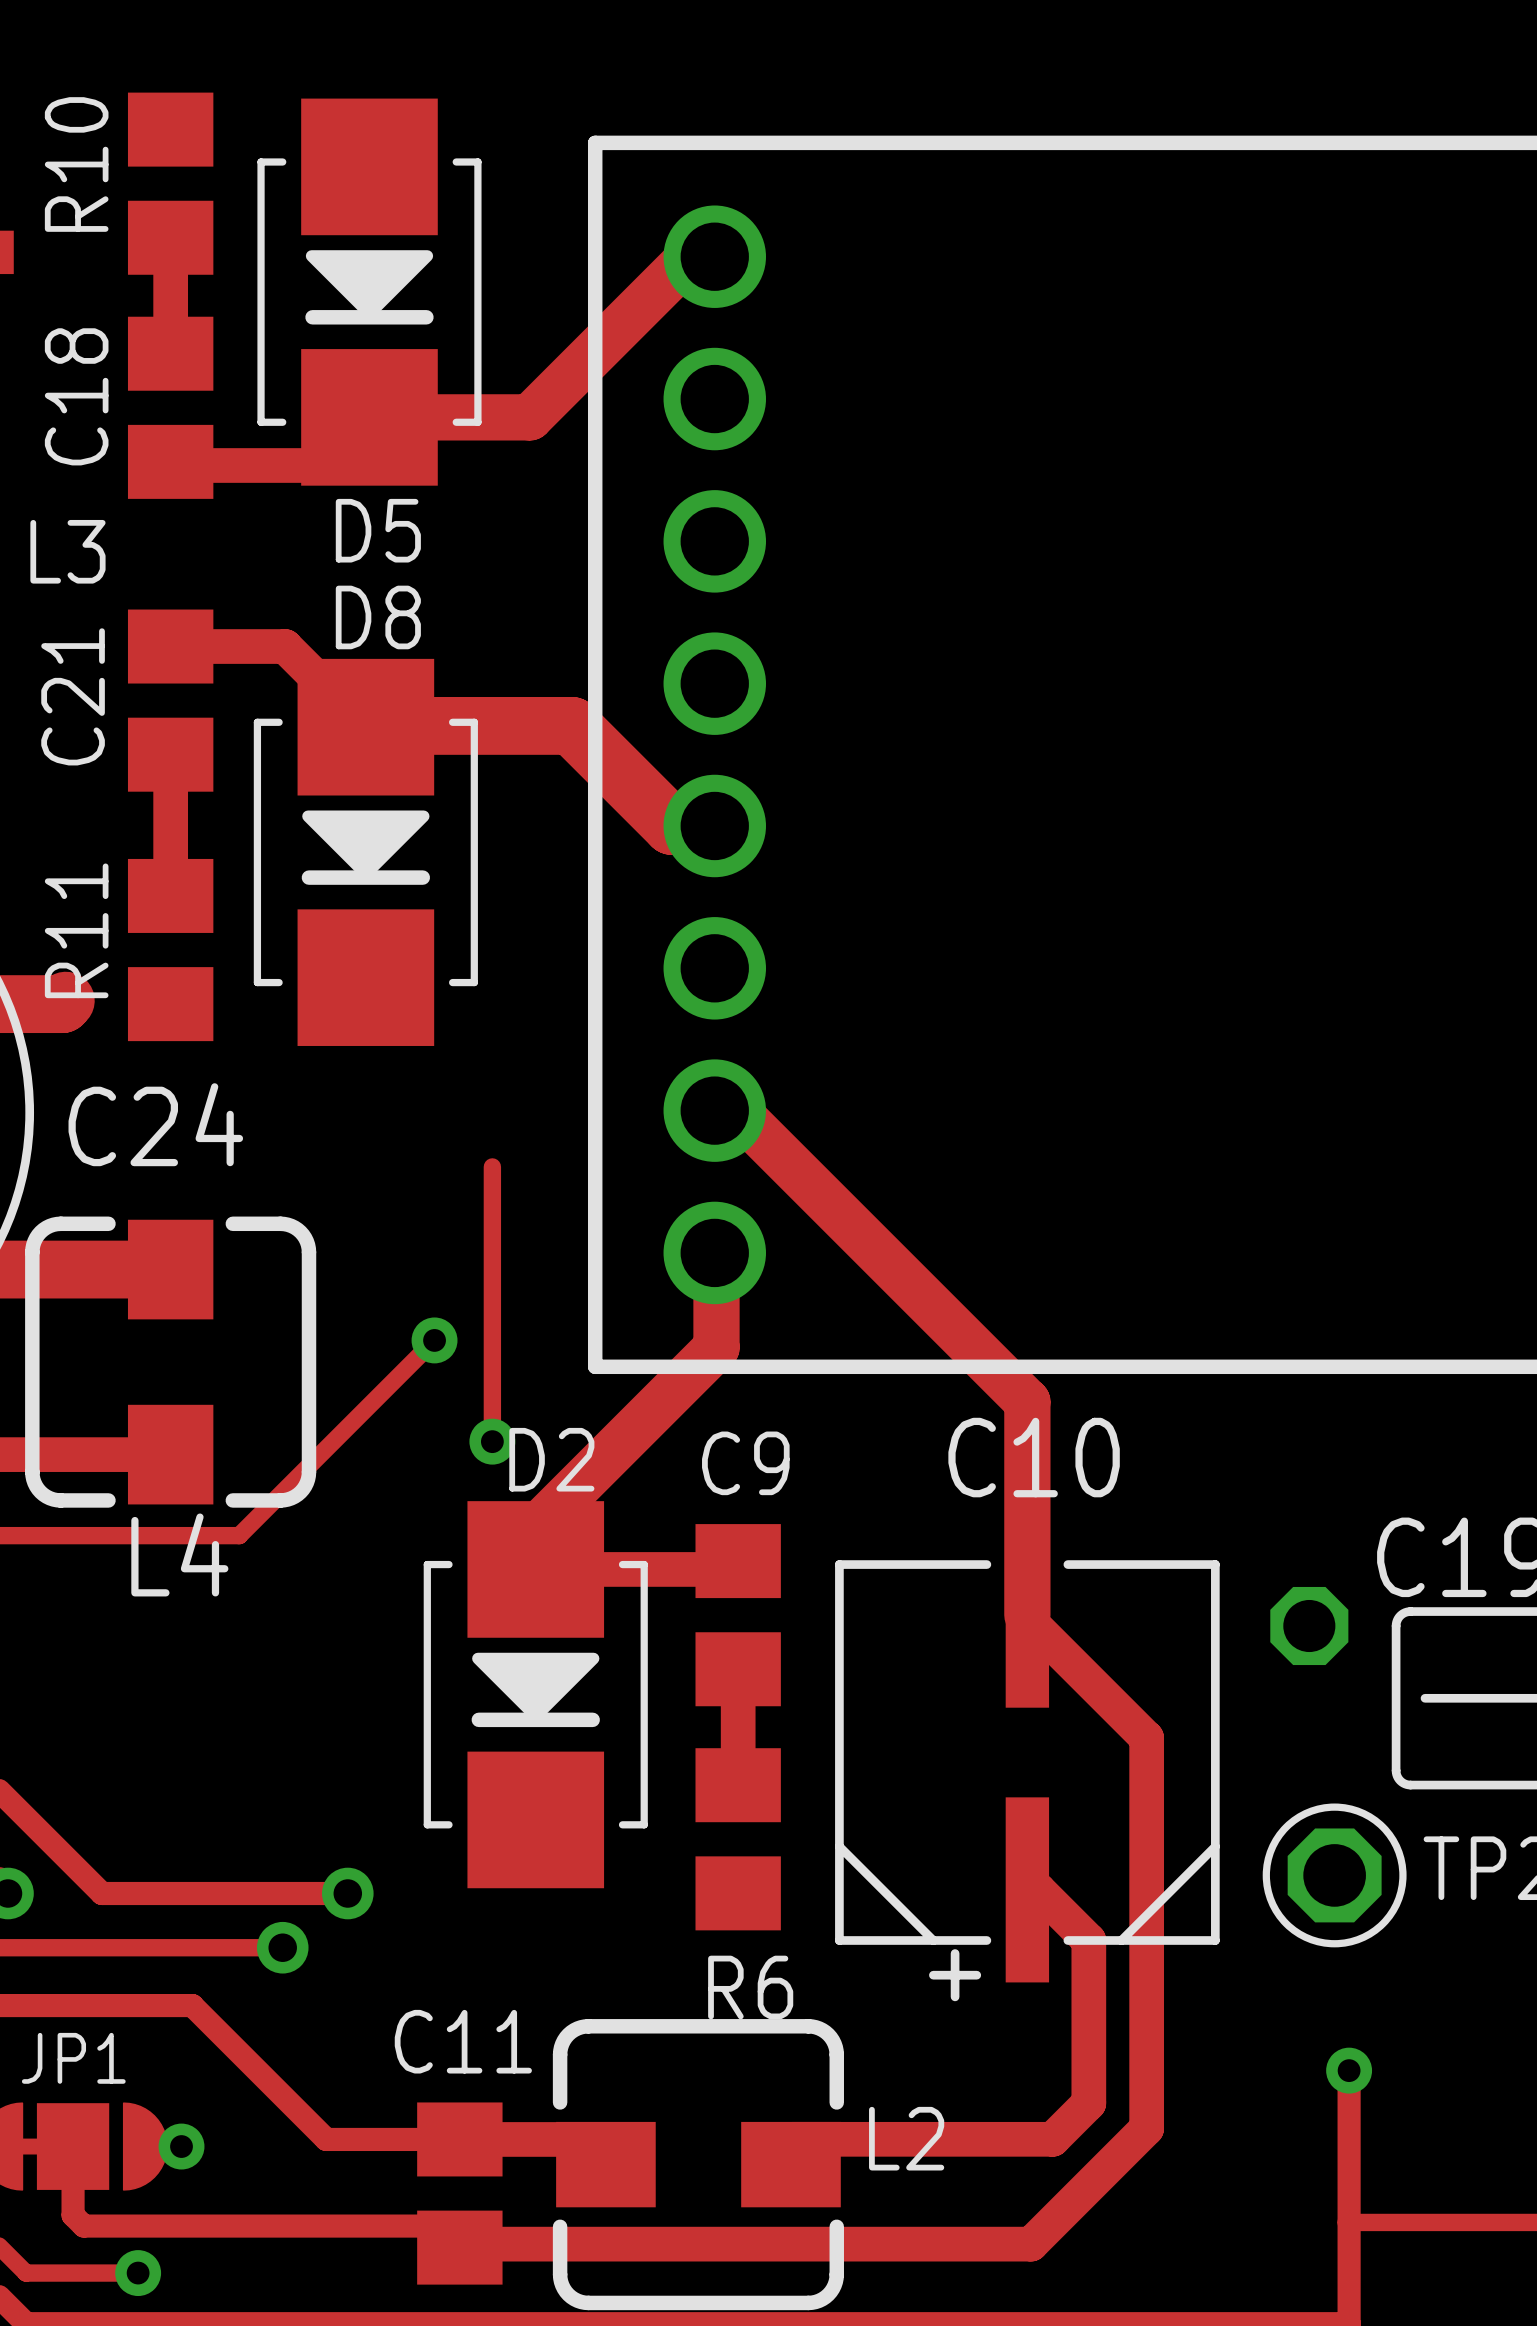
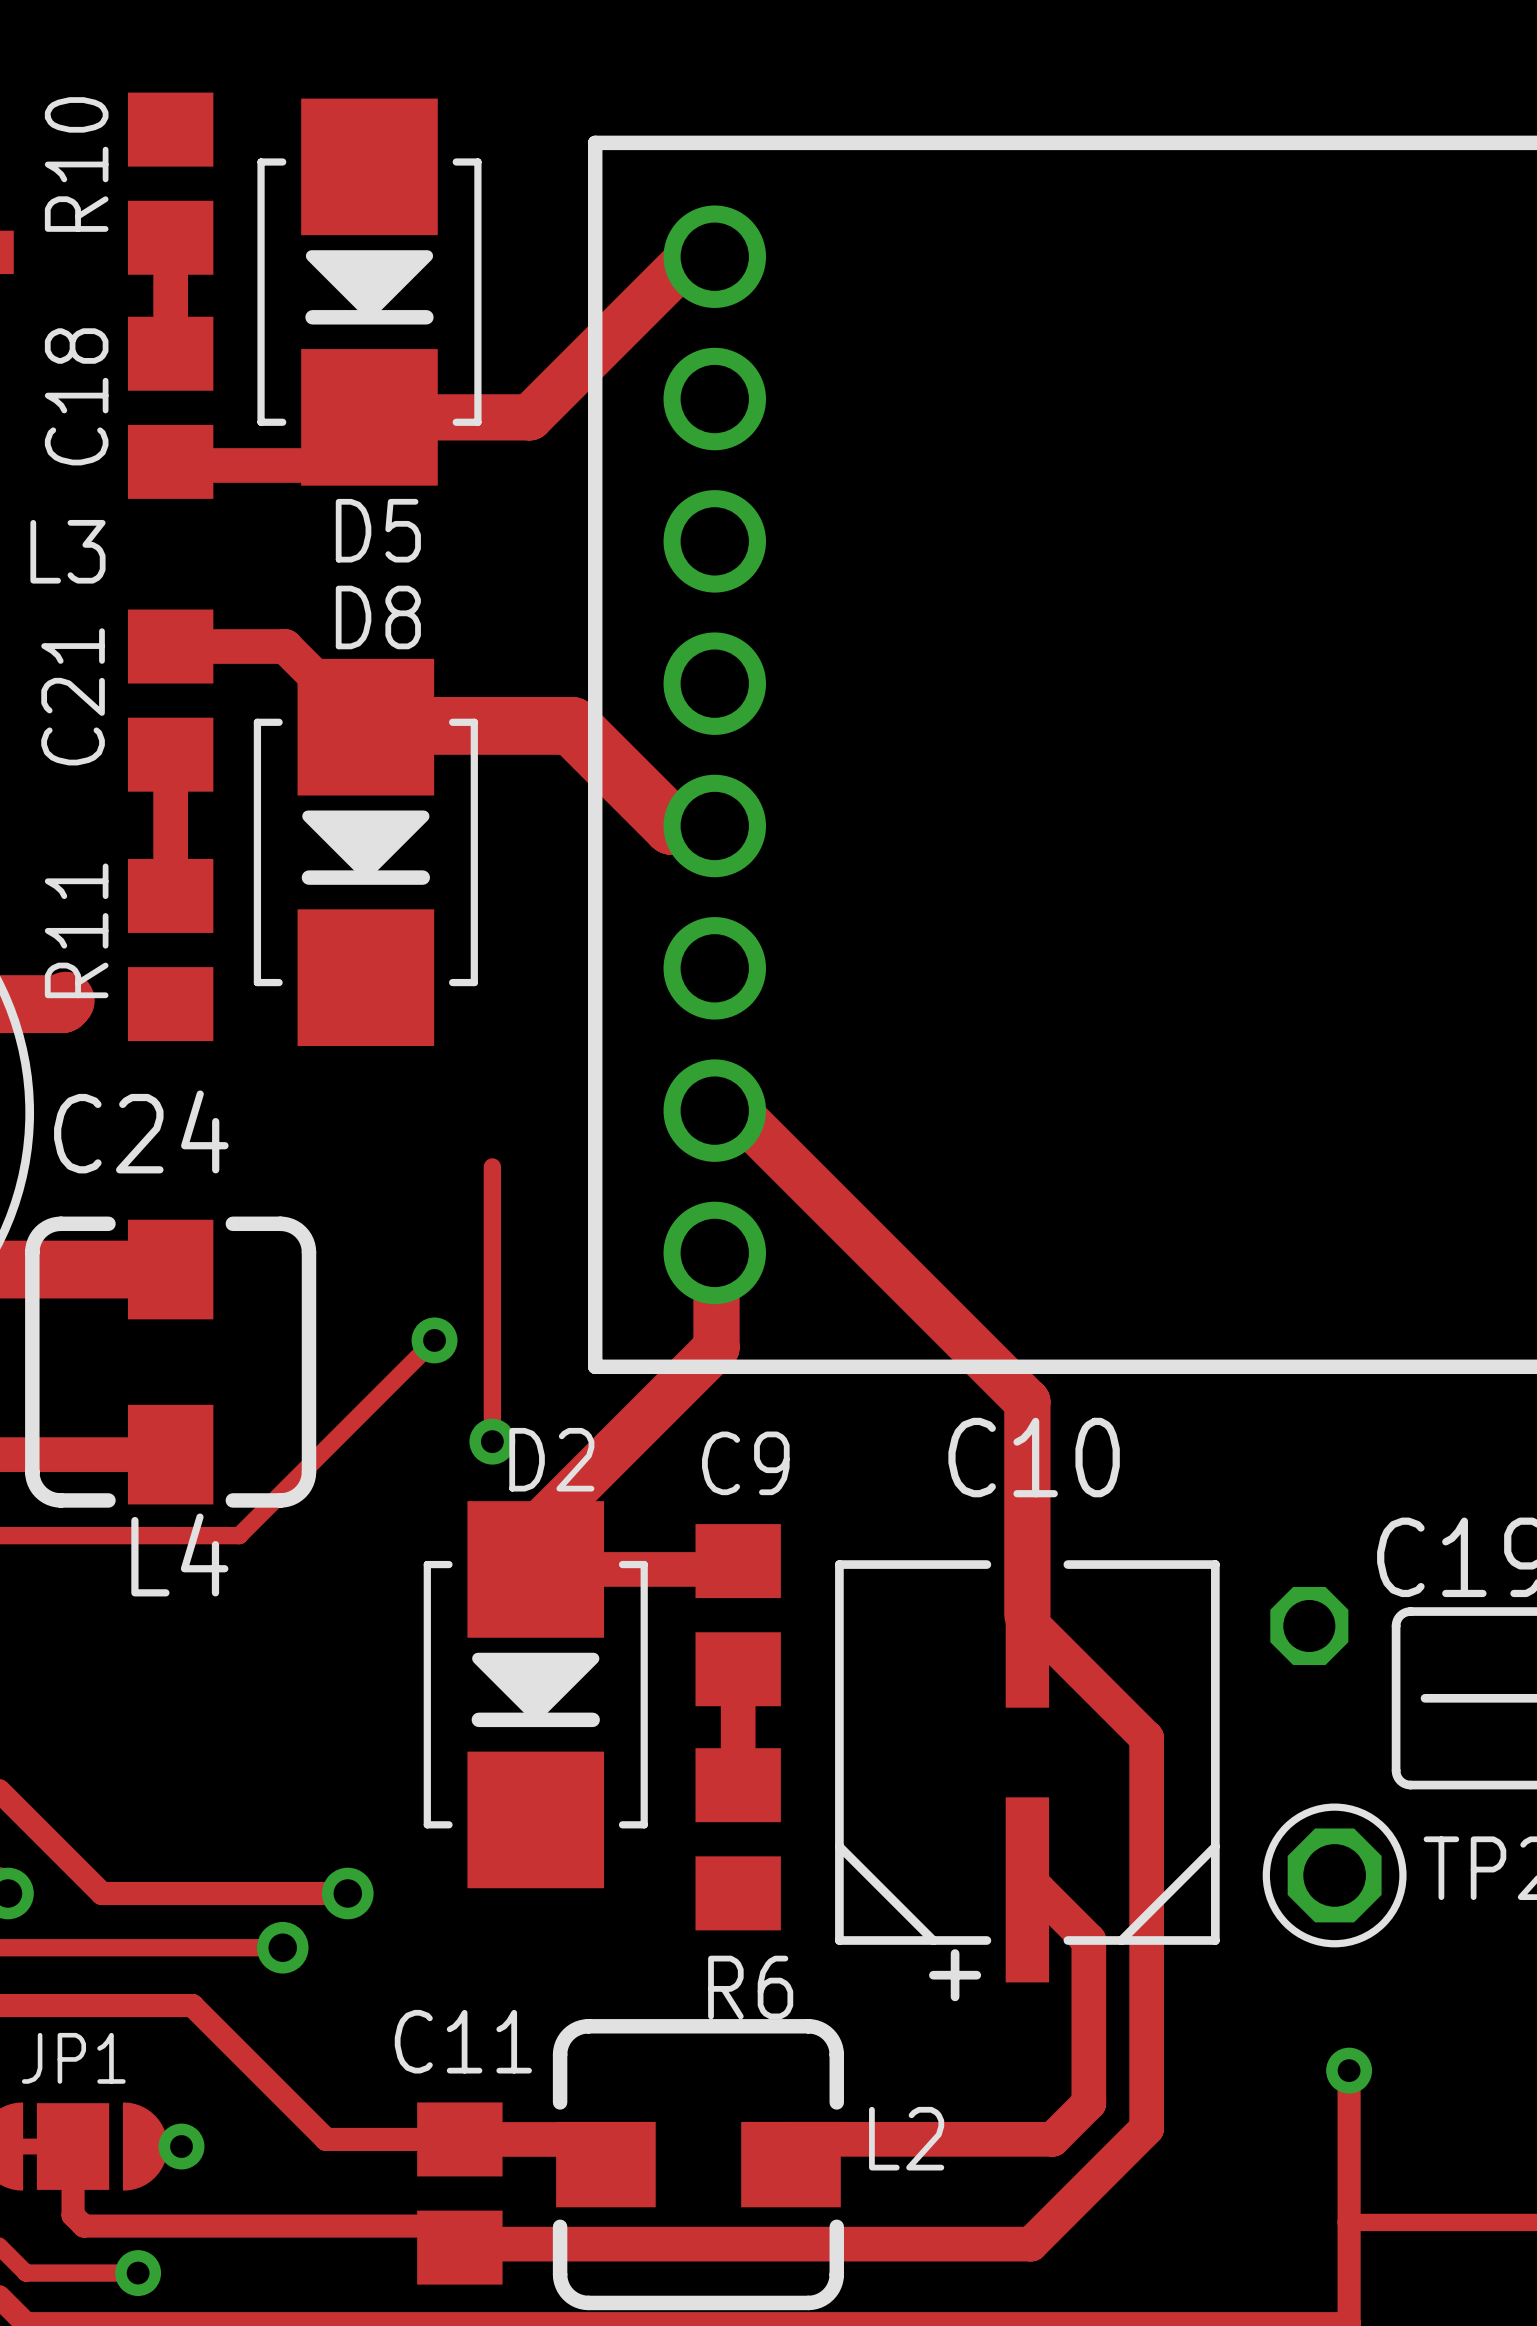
C24 name position: C24 (155, 1124) -> C24 (141, 1131)

